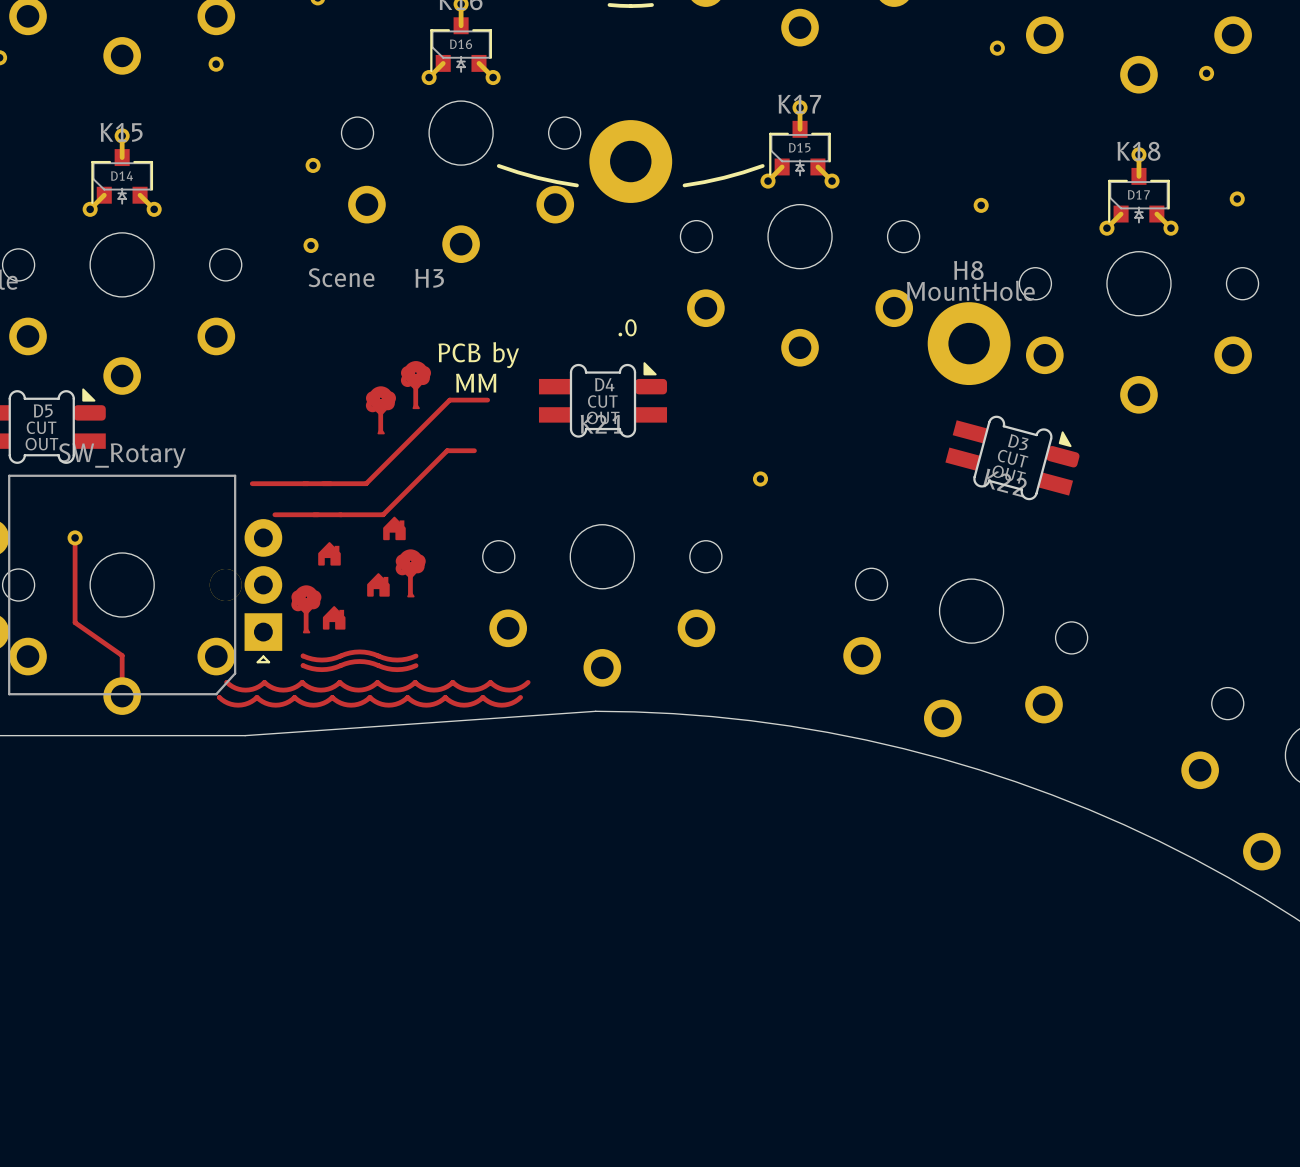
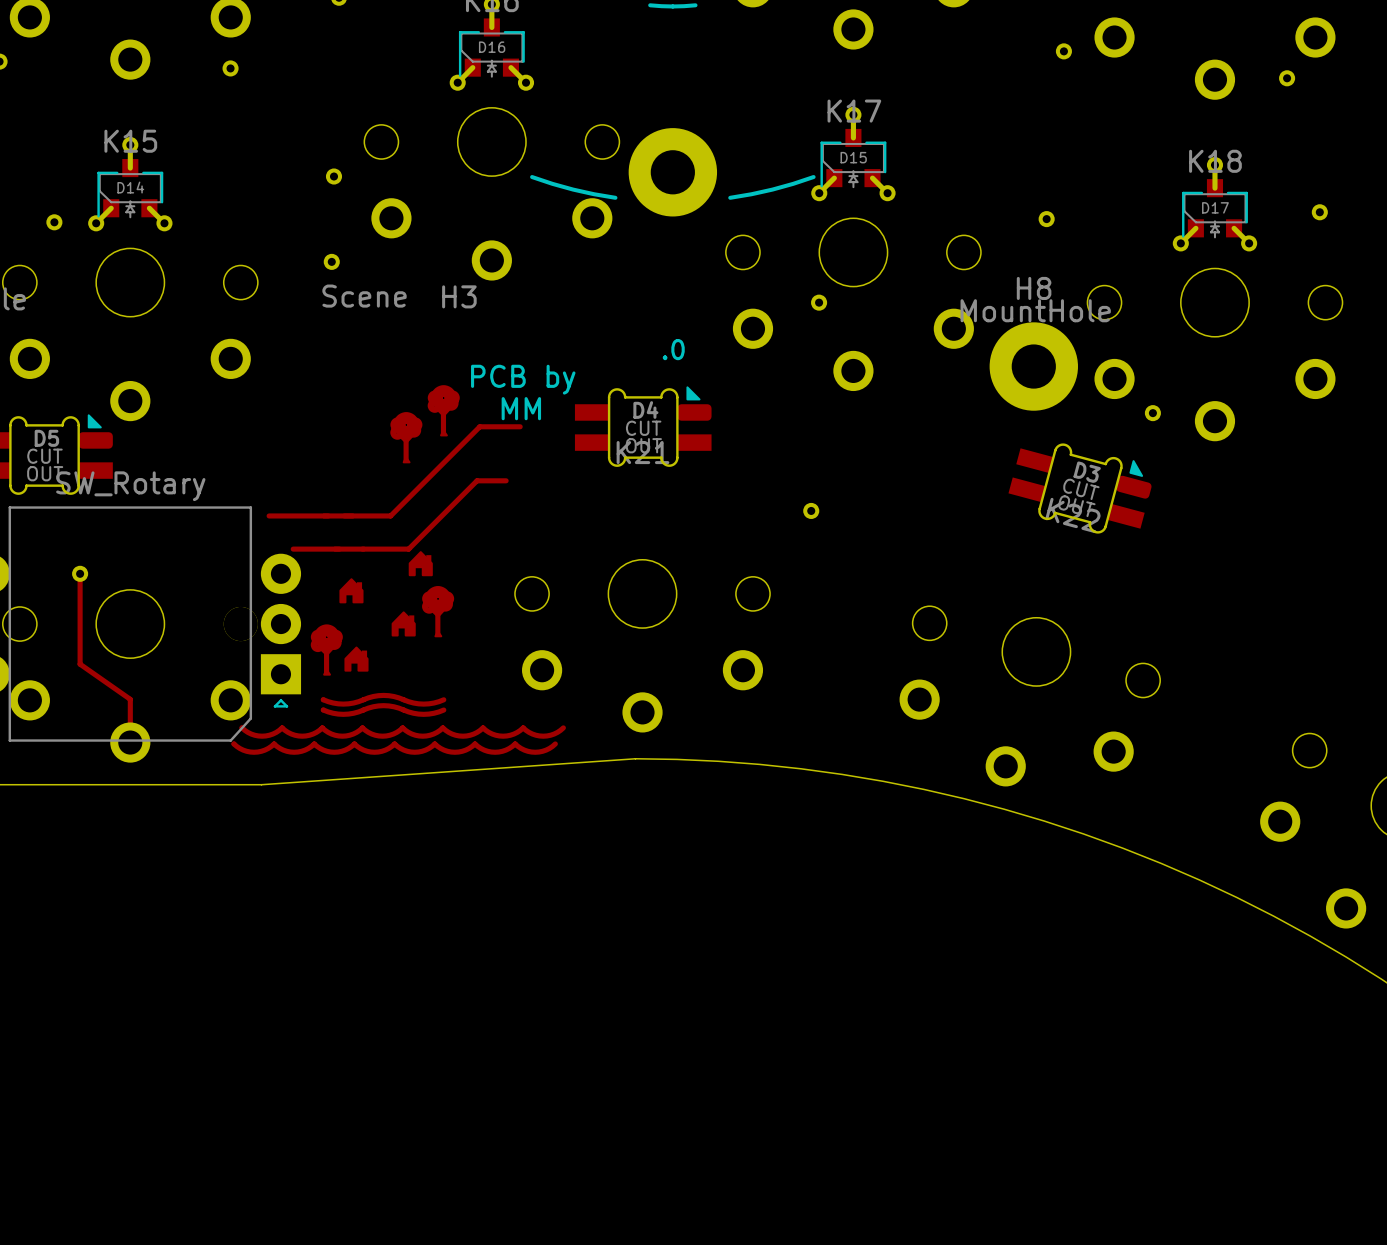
part: none -> (54, 222)
part: none -> (819, 302)
part: none -> (1152, 413)

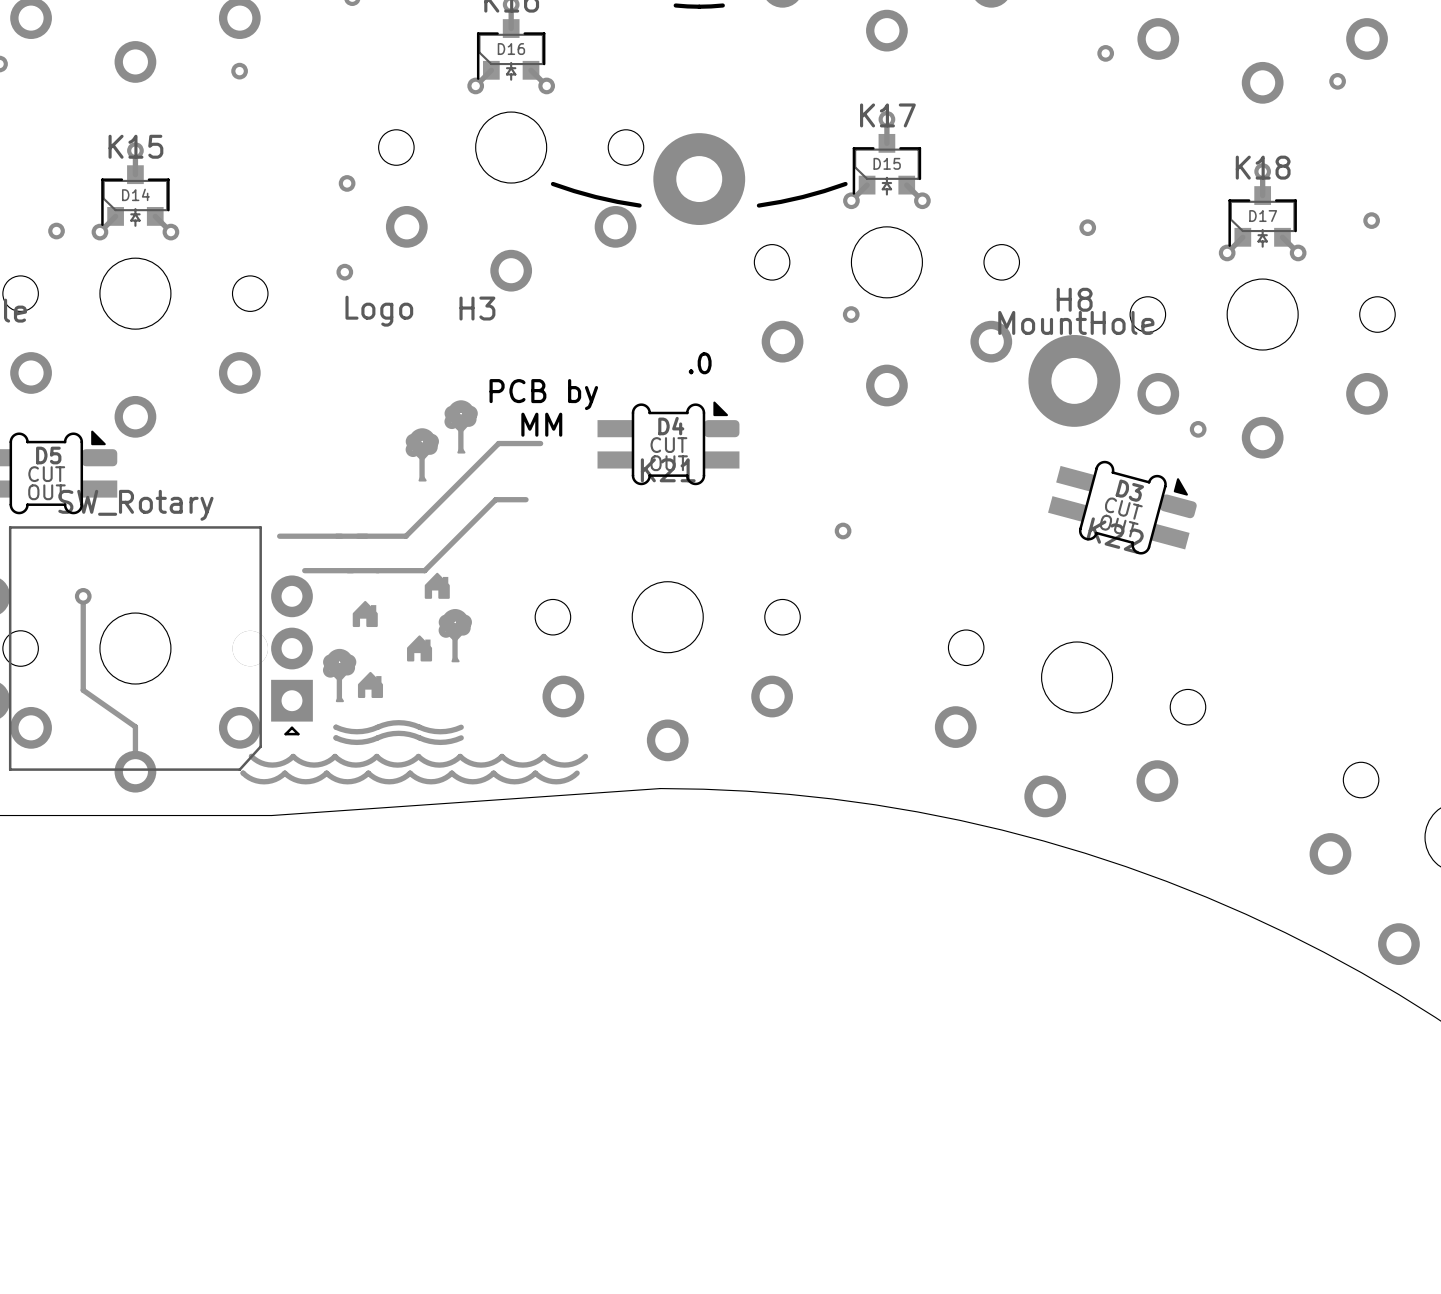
H3 value: Scene (364, 296) -> Logo (379, 311)

